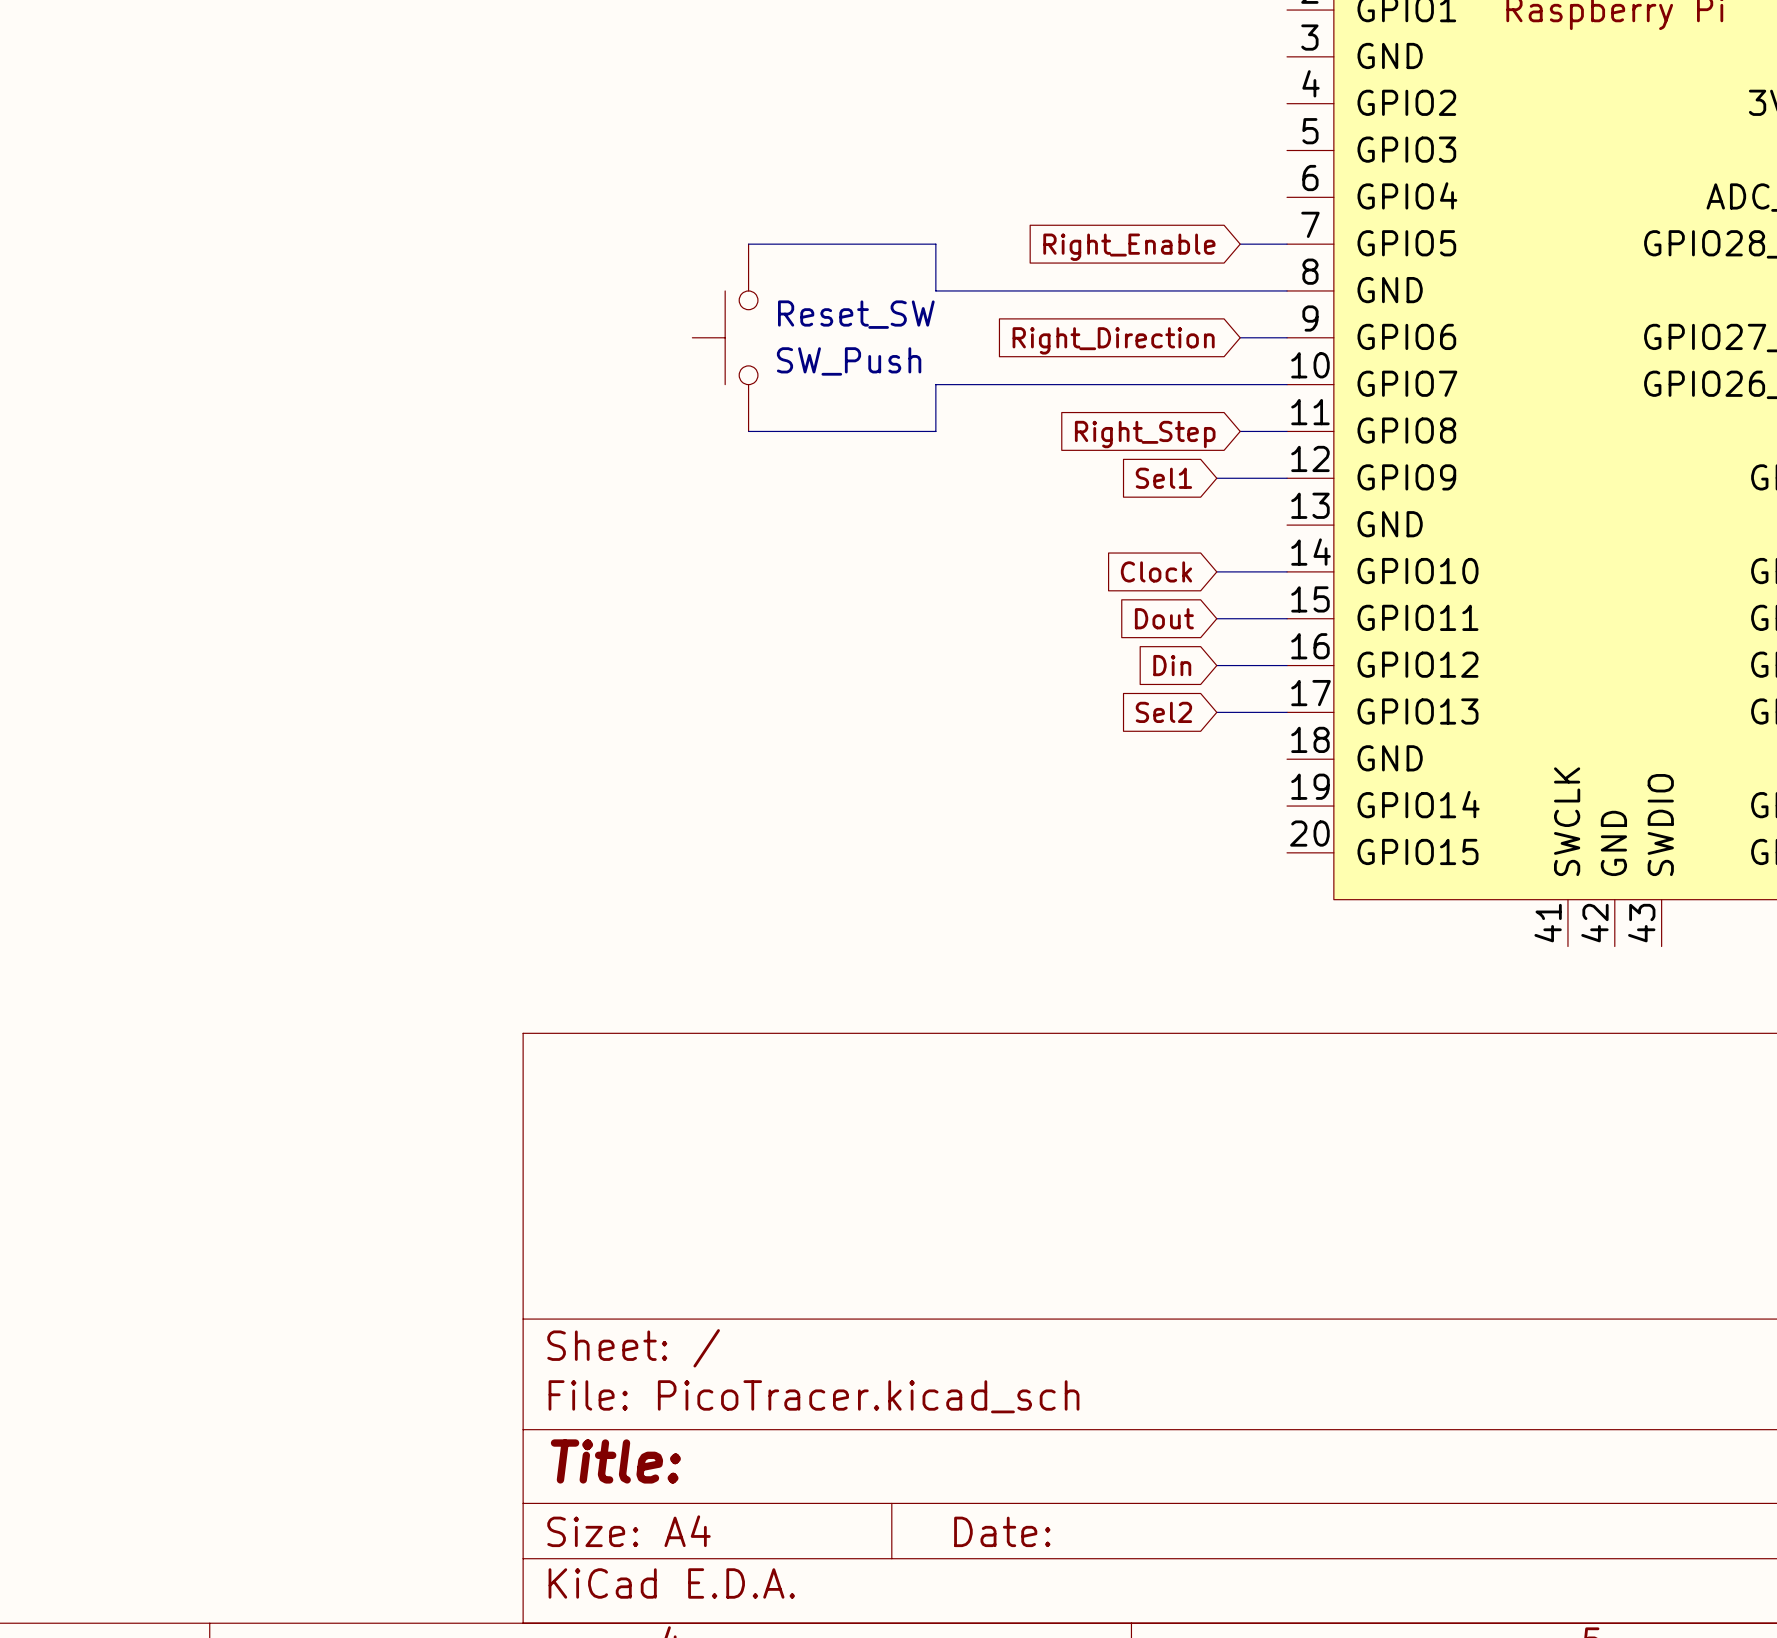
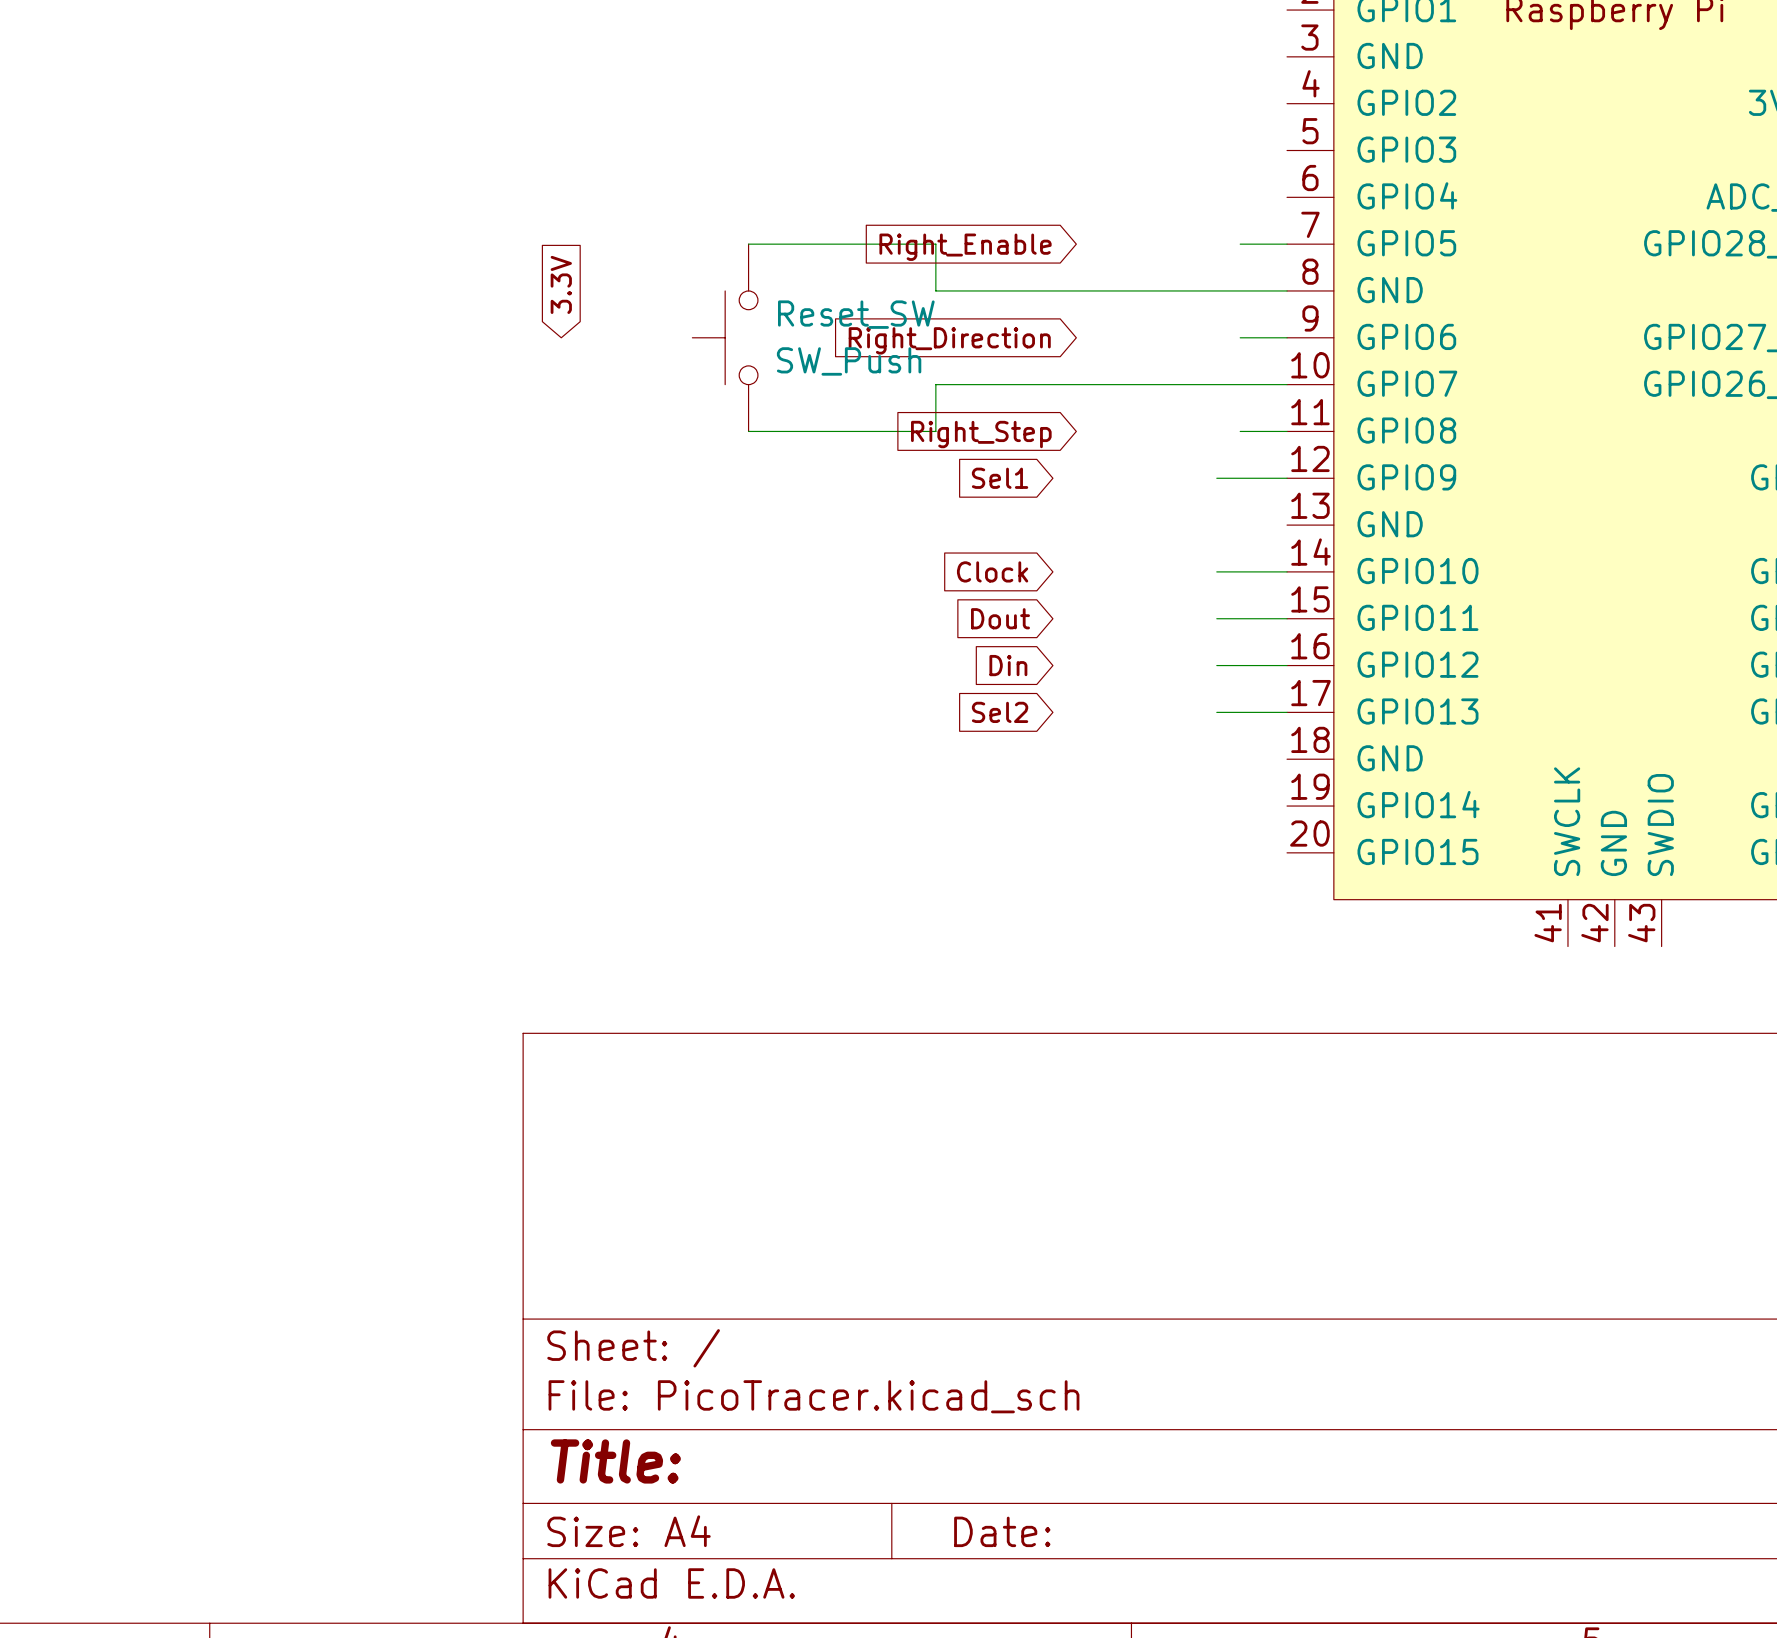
global label position: Right_Enable (1129, 247) -> Right_Enable (965, 247)
global label: none -> 3.3V (561, 284)
global label position: Right_Direction (1113, 340) -> Right_Direction (949, 340)
global label position: Right_Step (1145, 434) -> Right_Step (981, 434)
global label position: Sel1 (1163, 478) -> Sel1 (1000, 478)
global label position: Clock (1156, 571) -> Clock (992, 571)
global label position: Dout (1164, 618) -> Dout (1000, 618)
global label position: Din (1172, 665) -> Din (1008, 665)
global label position: Sel2 (1163, 712) -> Sel2 (1000, 712)

